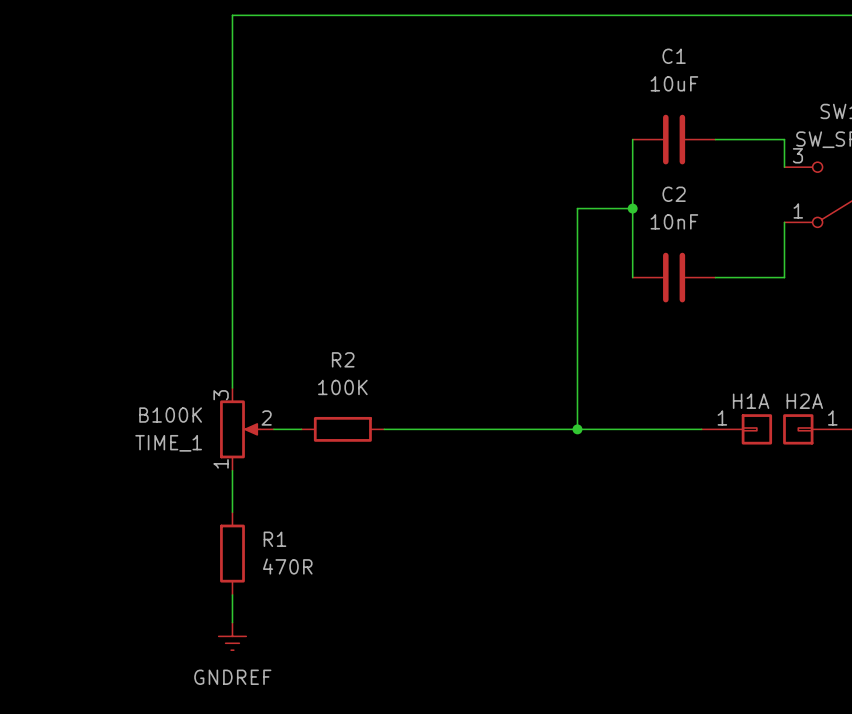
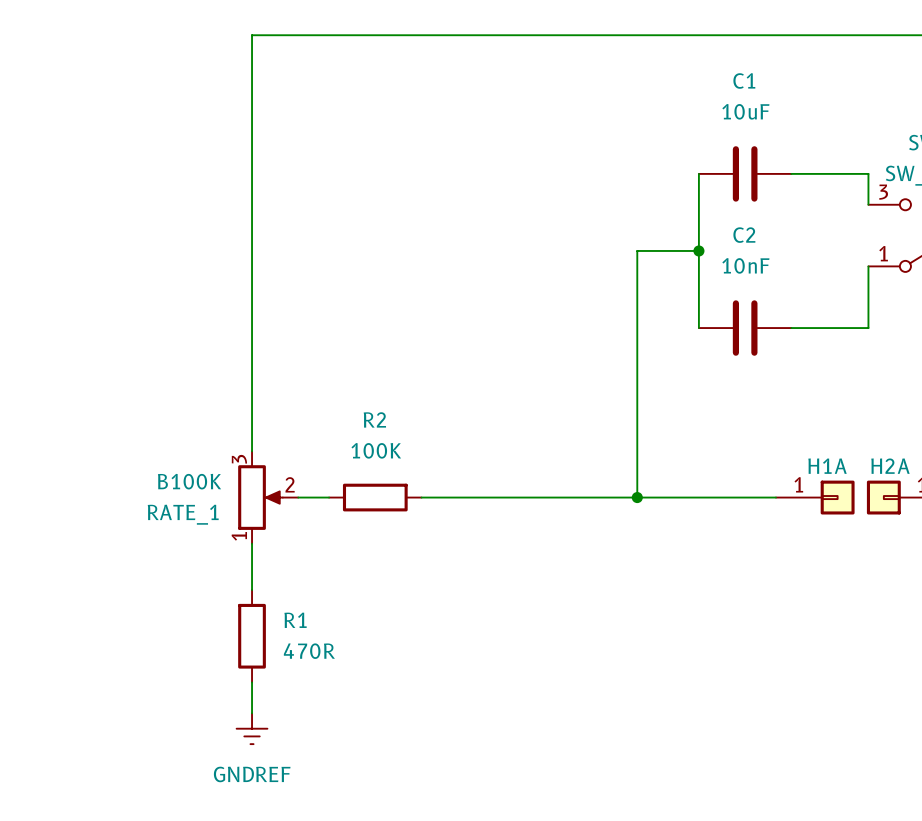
TIME_1 name: TIME_1 (168, 443) -> RATE_1 (183, 514)

